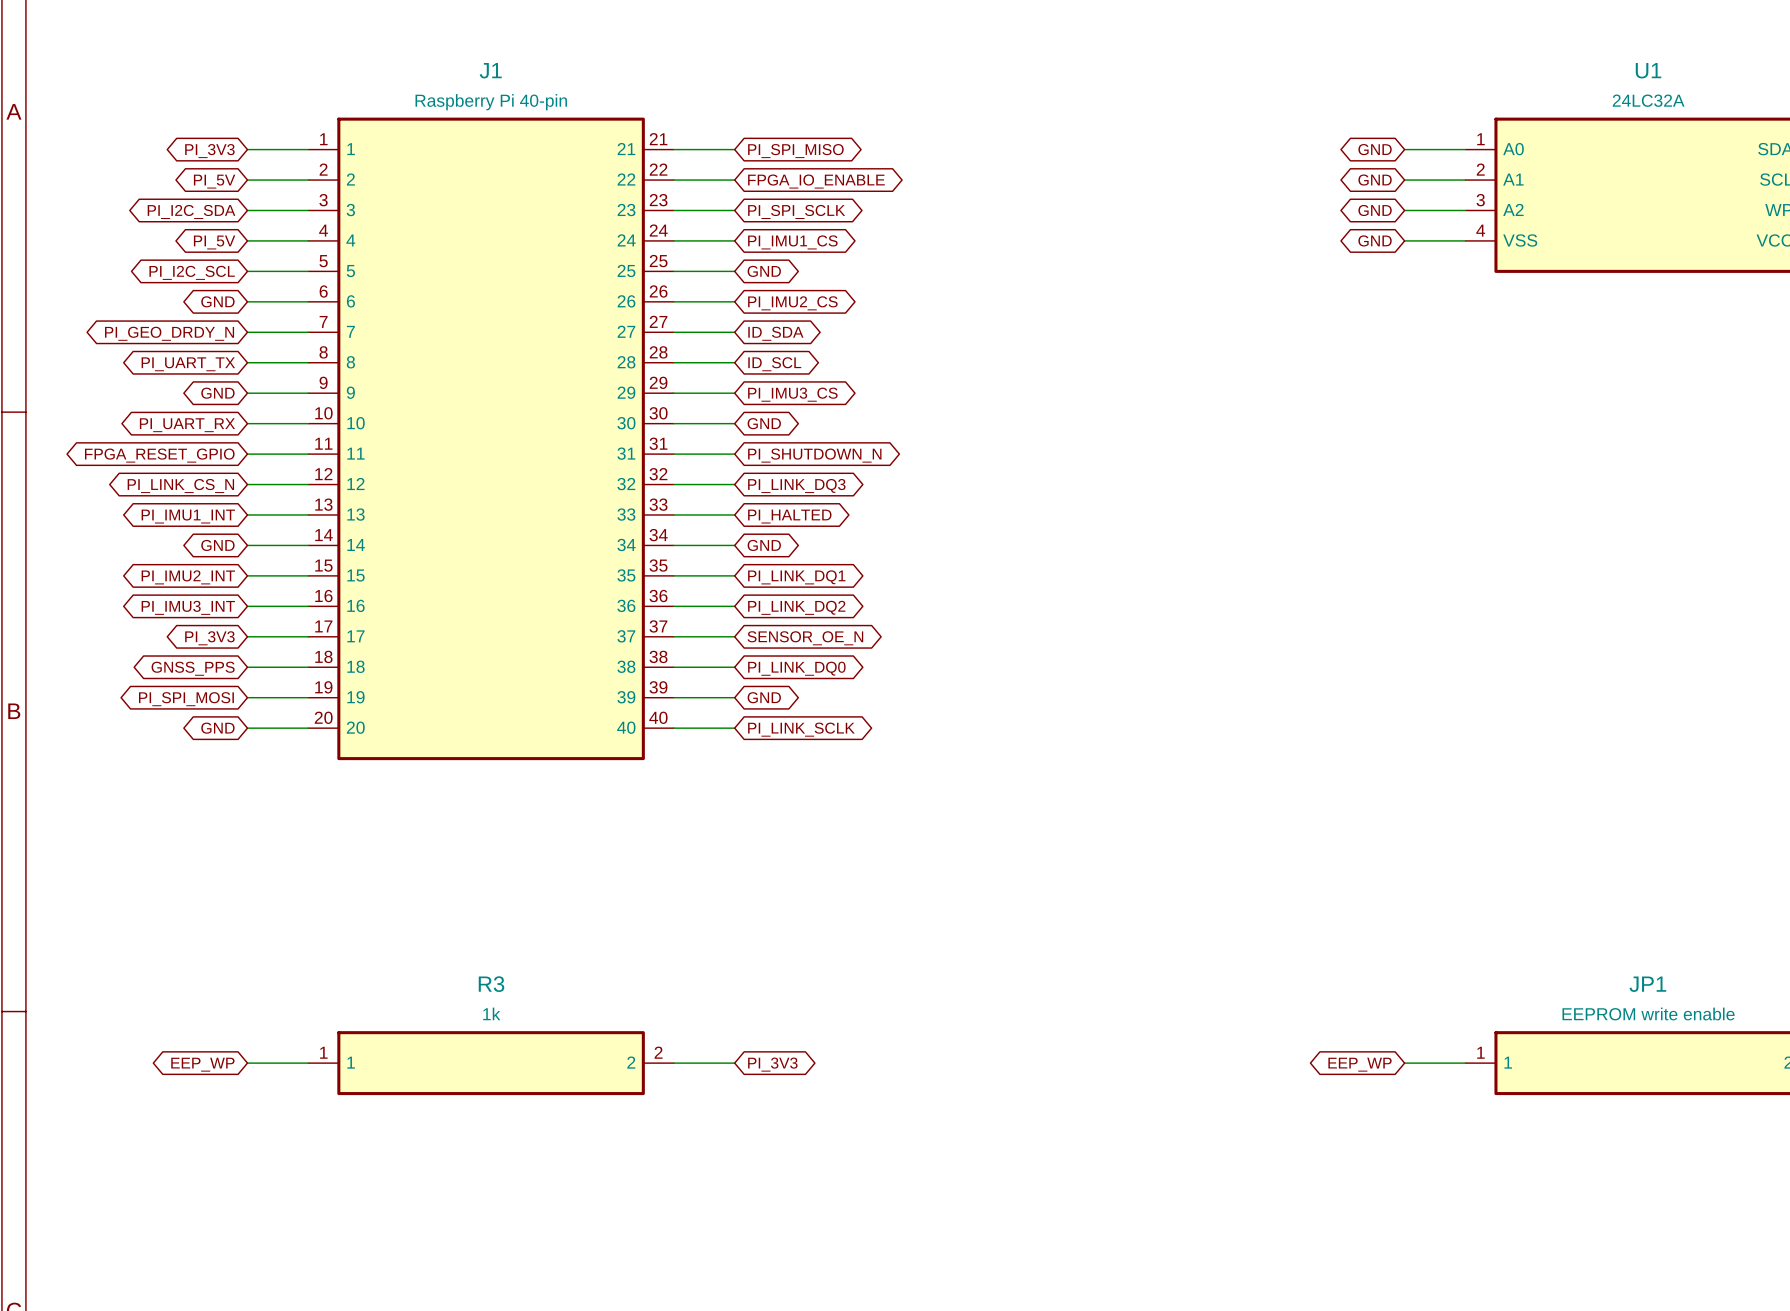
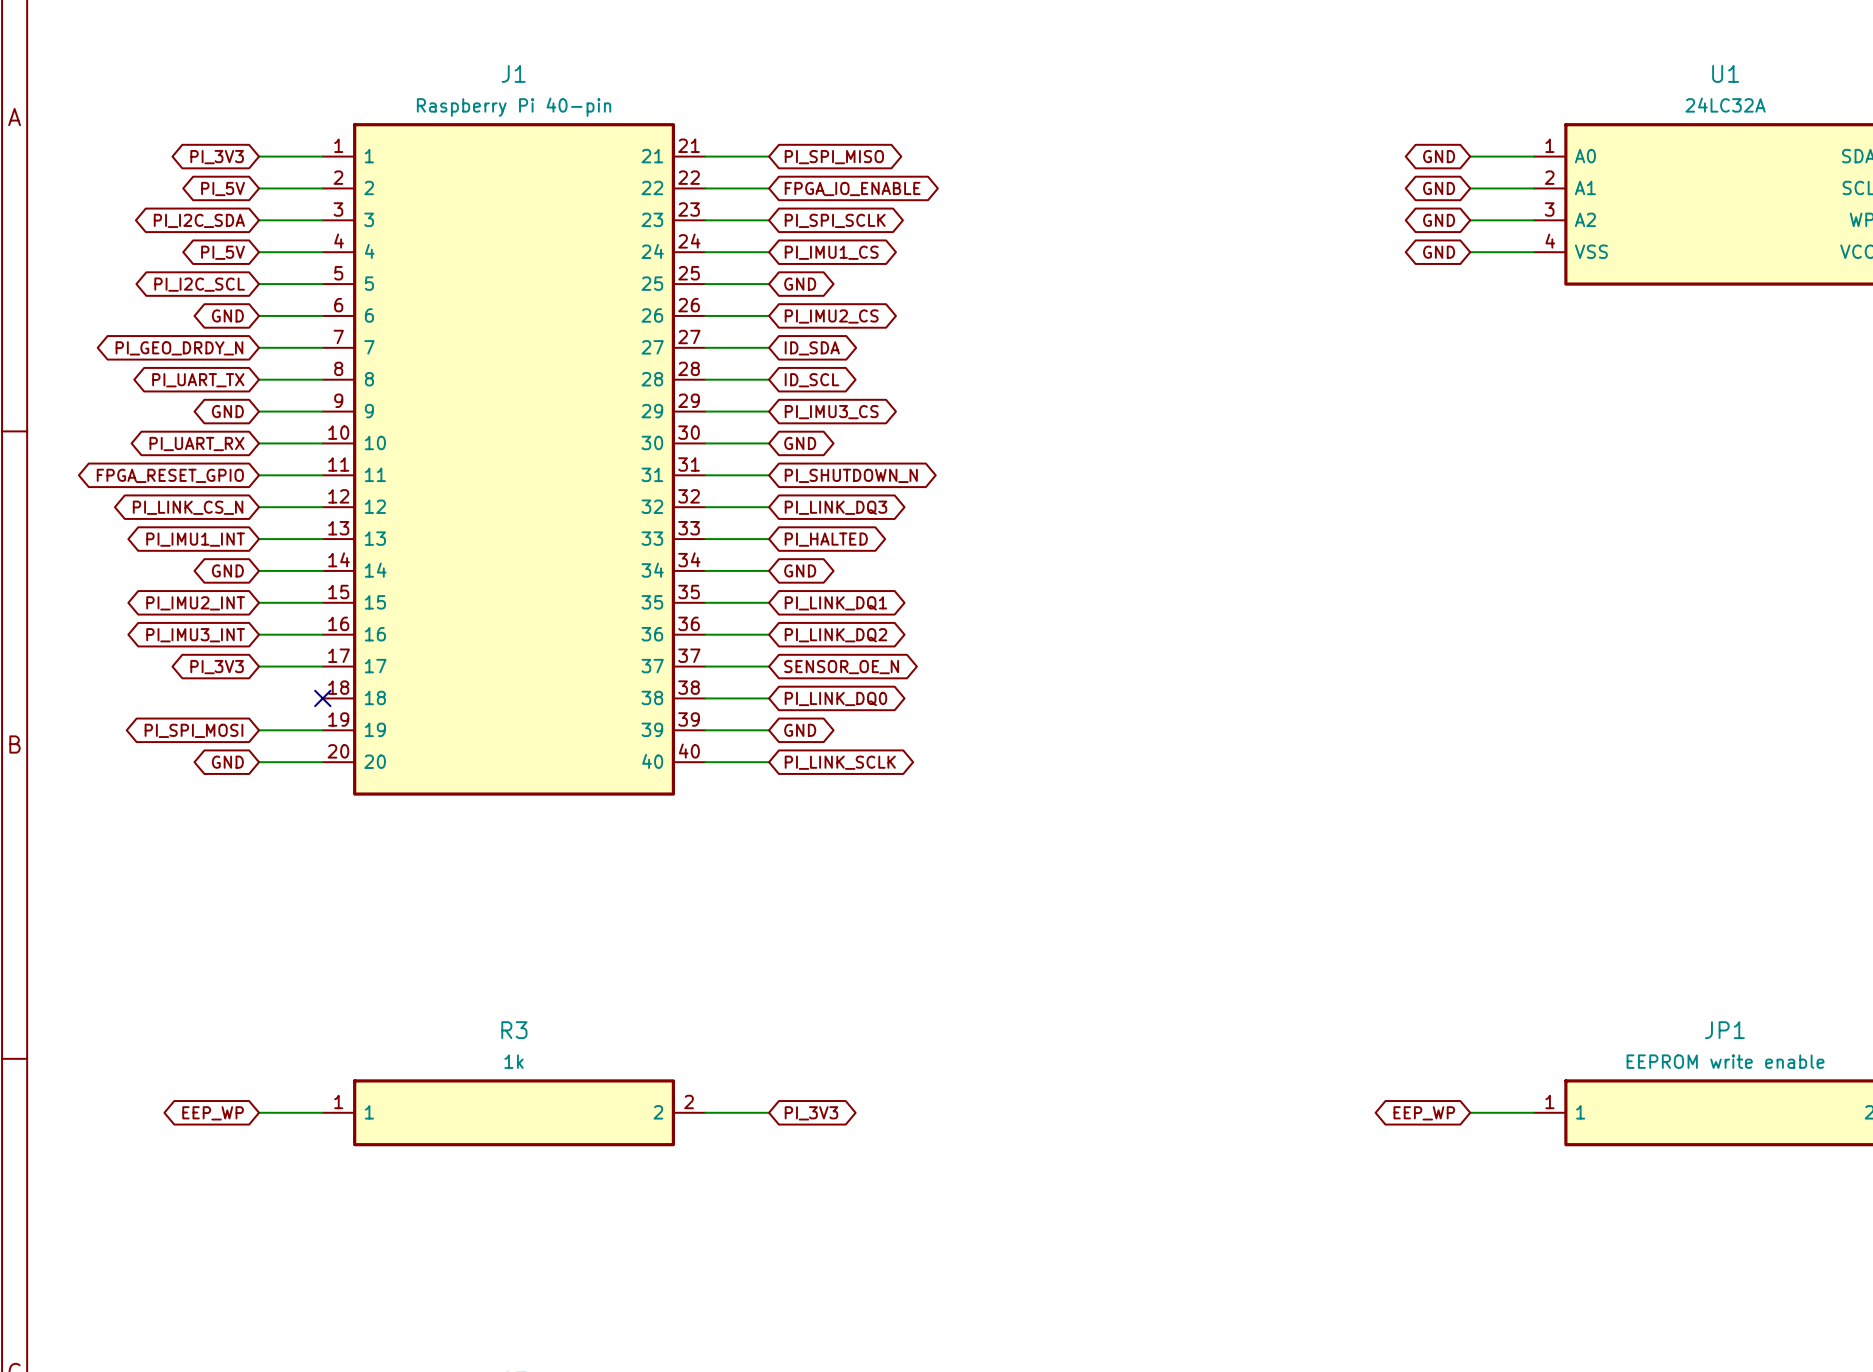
wire: (247, 667) (308, 667) -> none
no-connect mark: none -> (322, 698)
global label: GNSS_PPS (193, 668) -> none

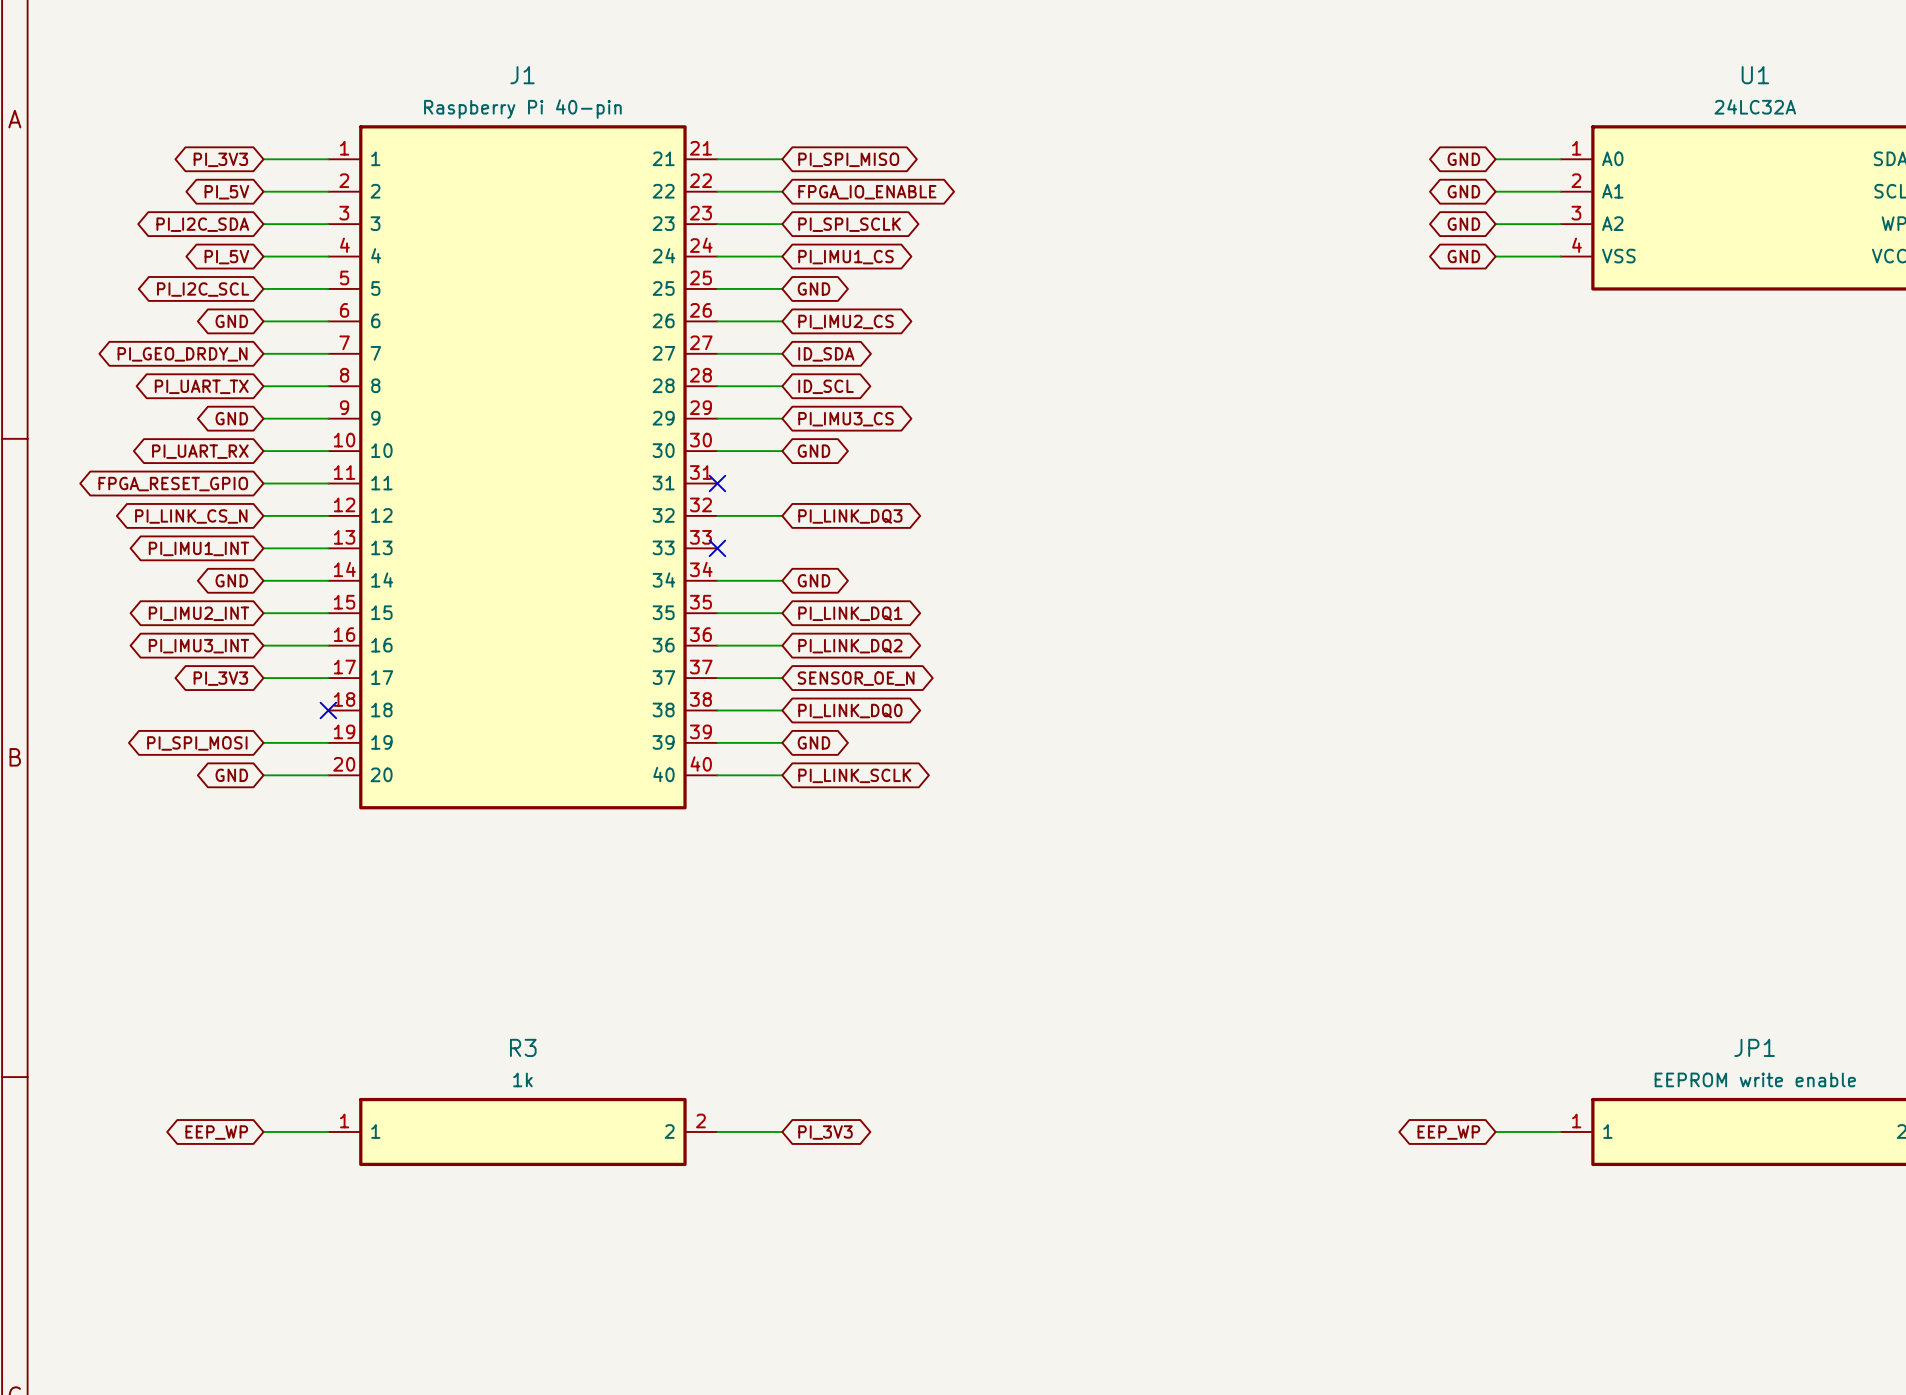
wire: (705, 475) (769, 475) -> none
no-connect mark: none -> (717, 483)
global label: PI_SHUTDOWN_N (851, 475) -> none
wire: (705, 539) (769, 539) -> none
no-connect mark: none -> (717, 548)
global label: PI_HALTED (826, 539) -> none

